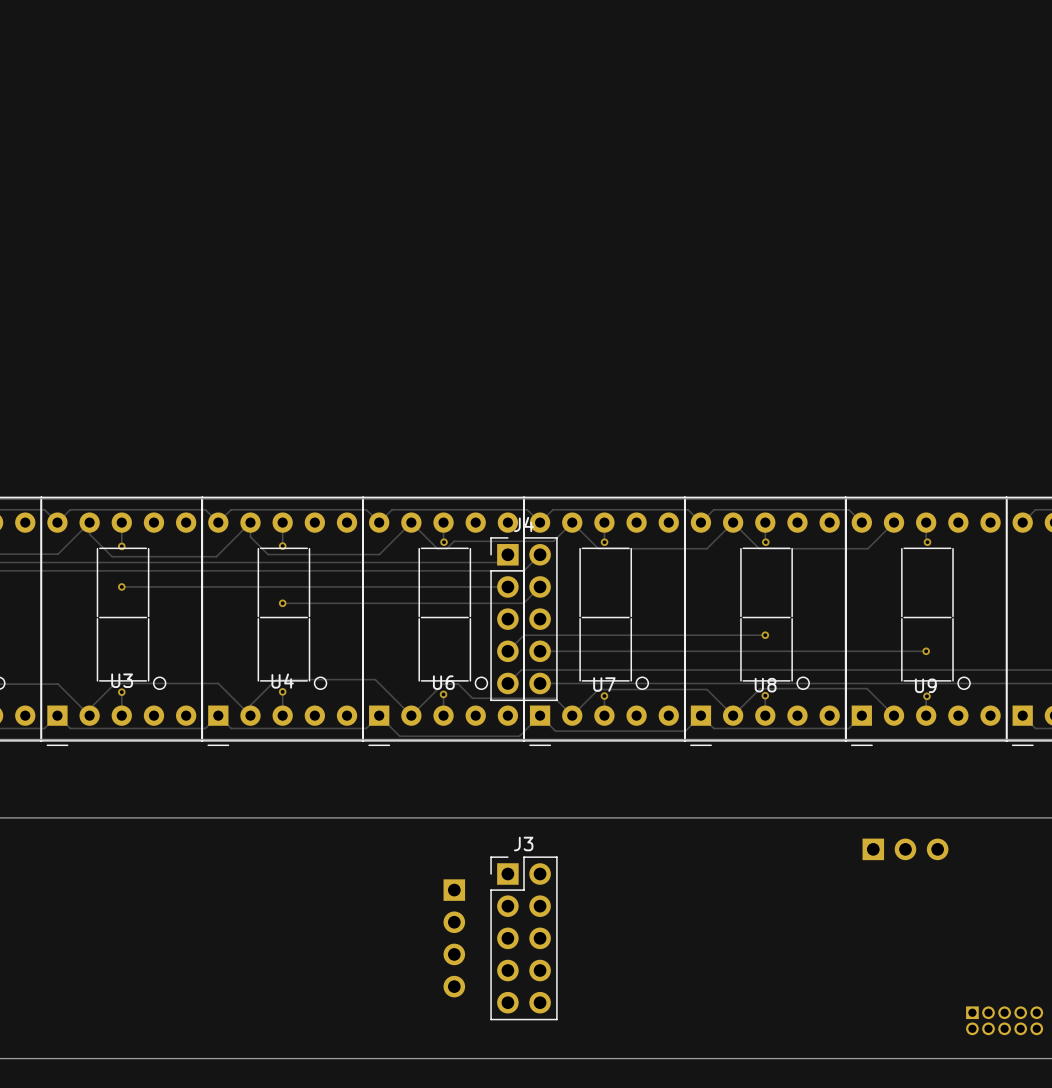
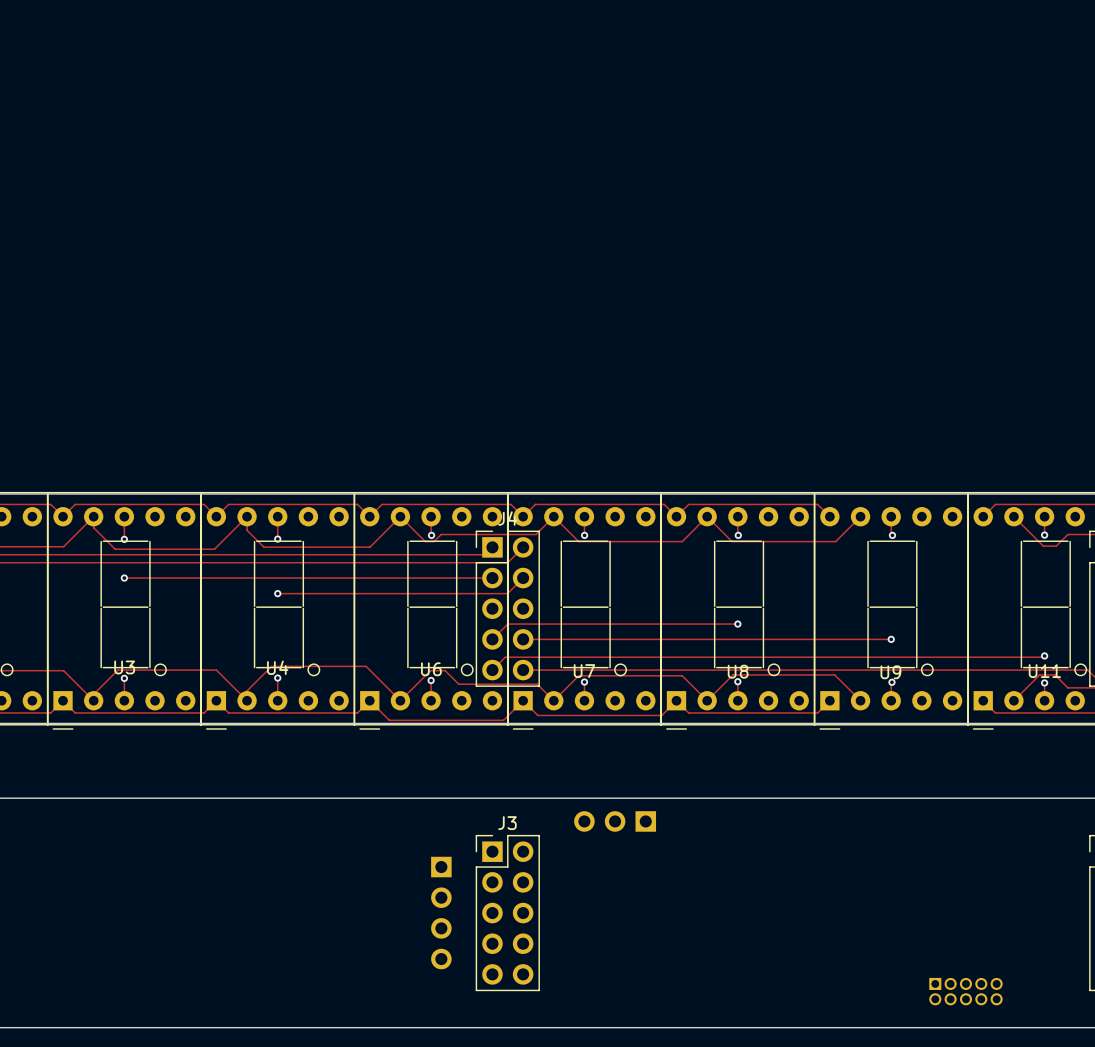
part rotation: 0° (905, 849) -> 180° (615, 821)
part position: (905, 849) -> (615, 821)

